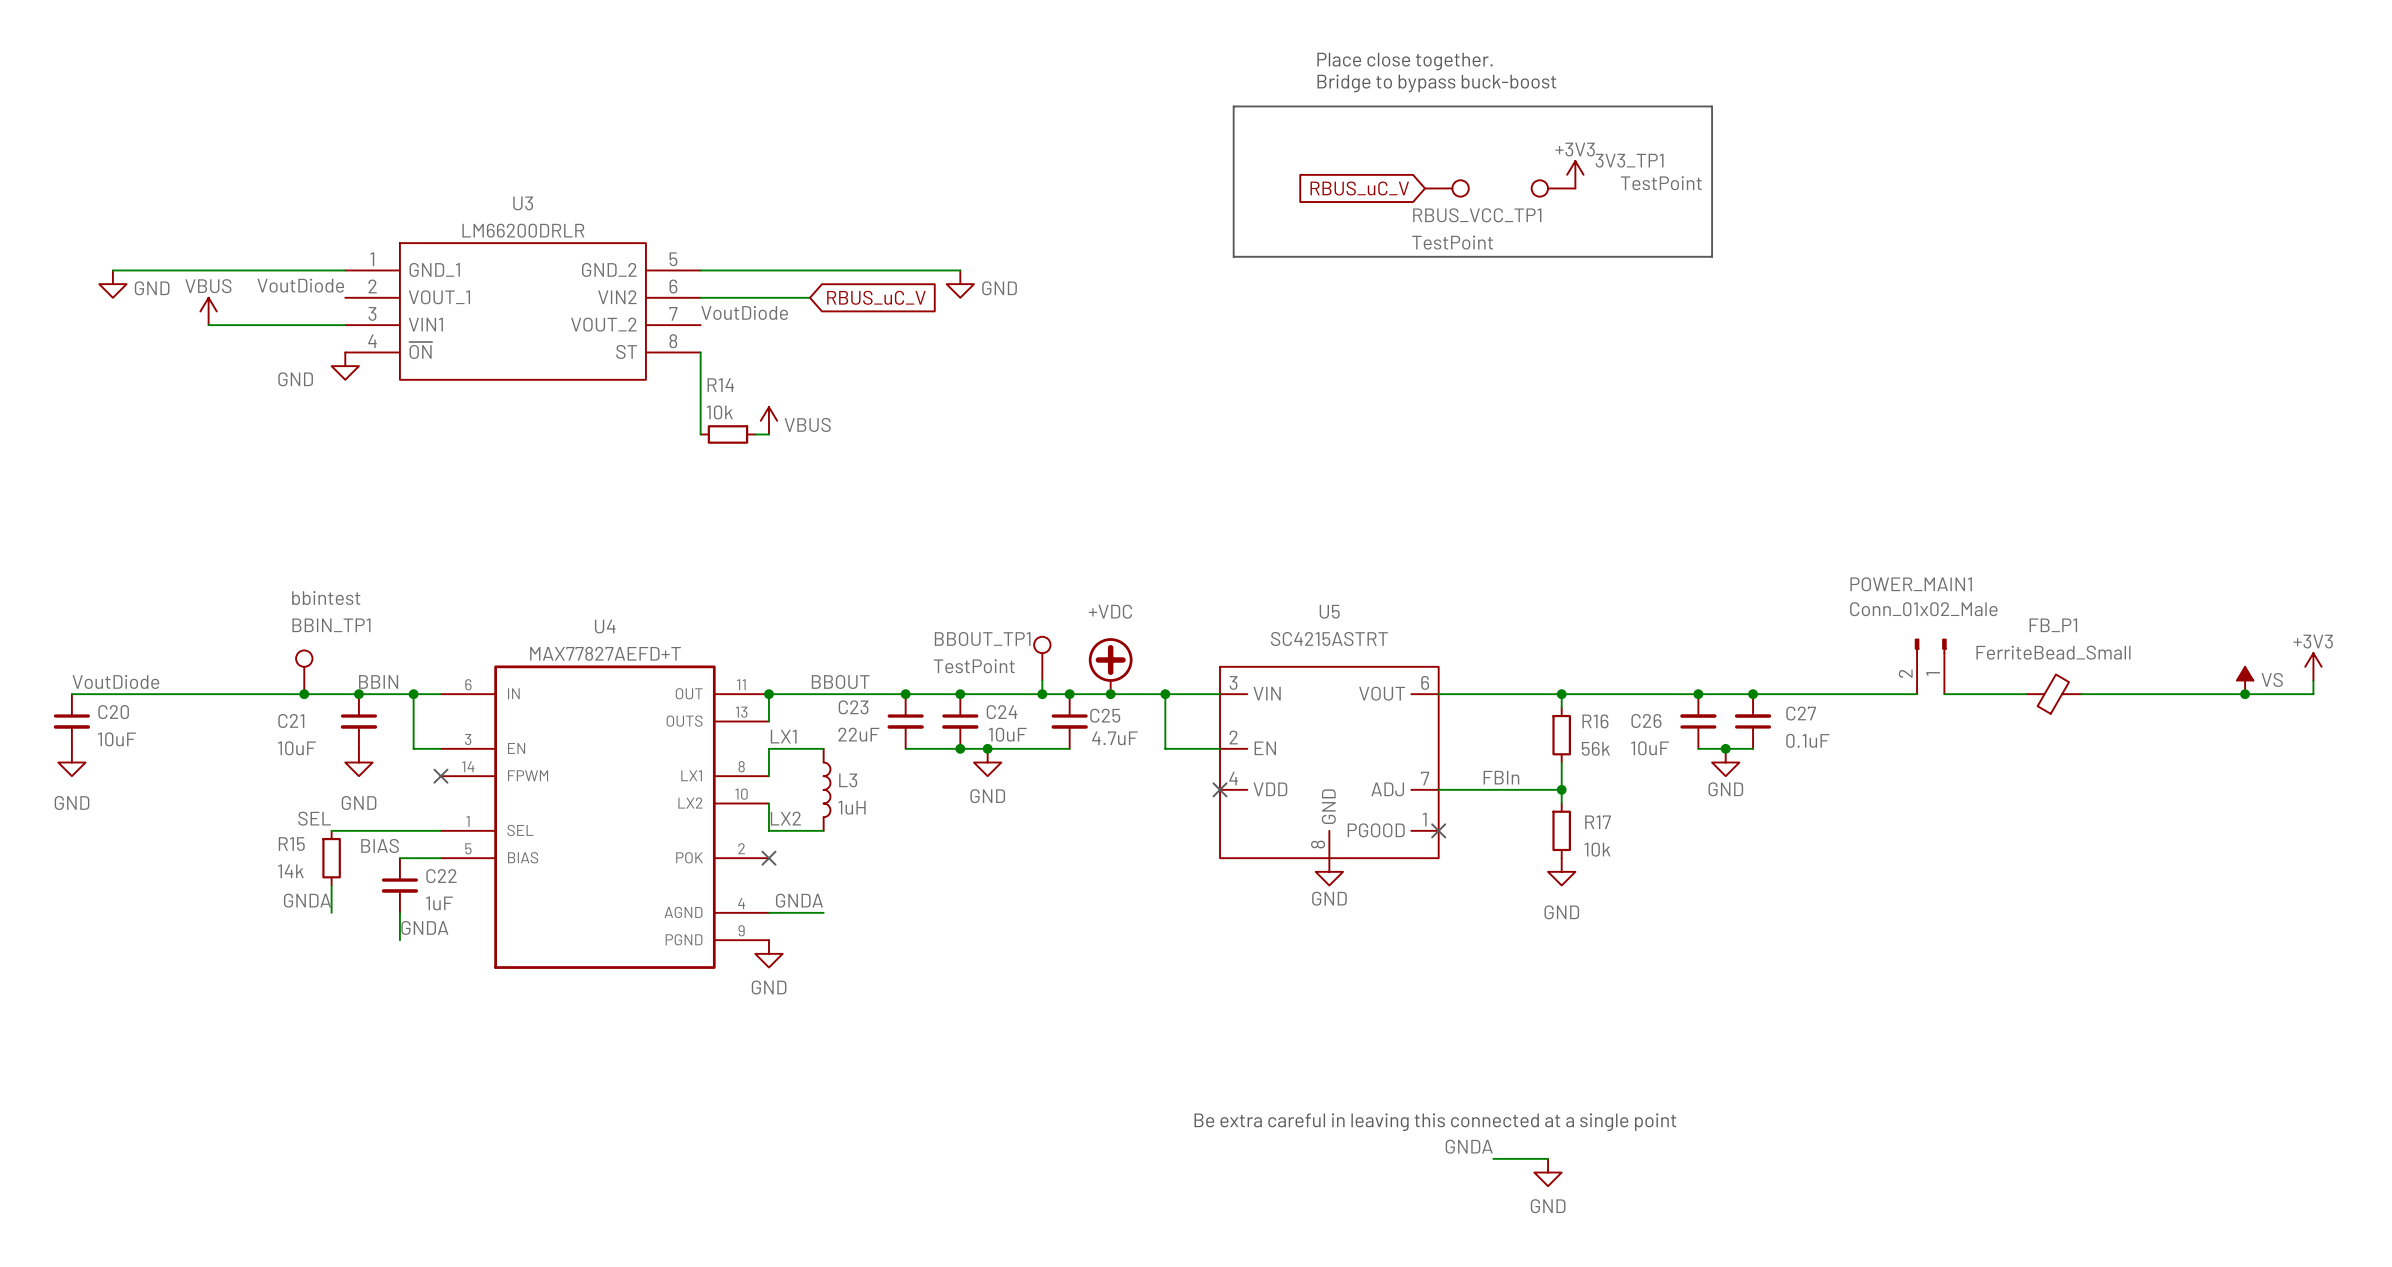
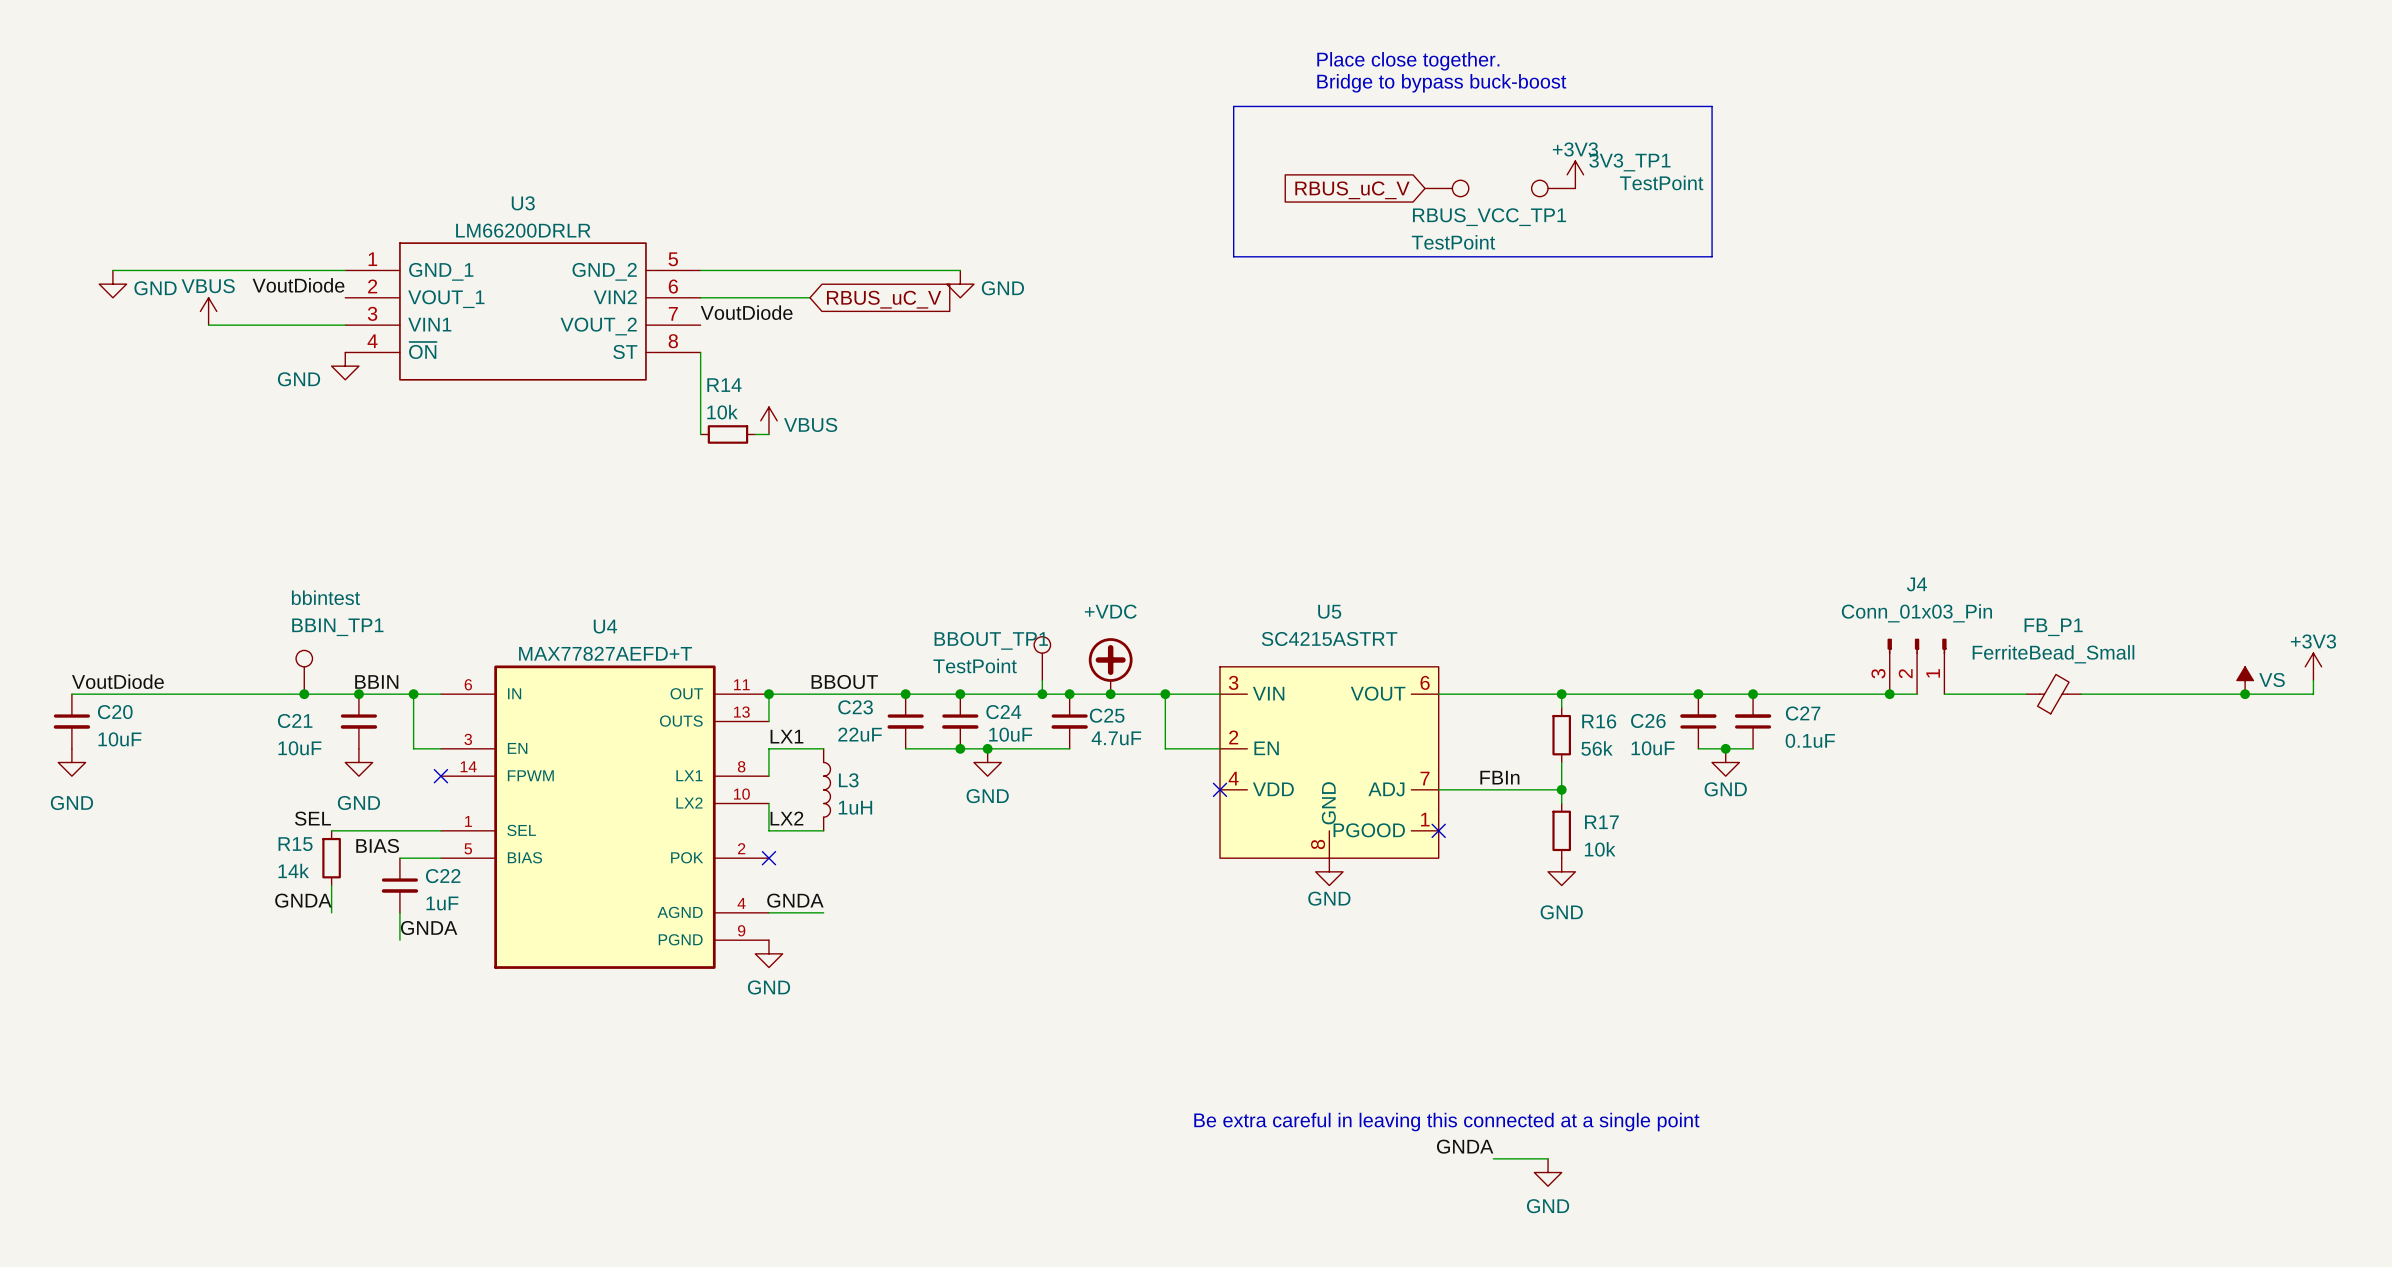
J4: none -> Conn_01x03_Pin (1917, 666)
POWER_MAIN1: Conn_01x02_Male (1930, 666) -> none
junction: none -> (1889, 694)

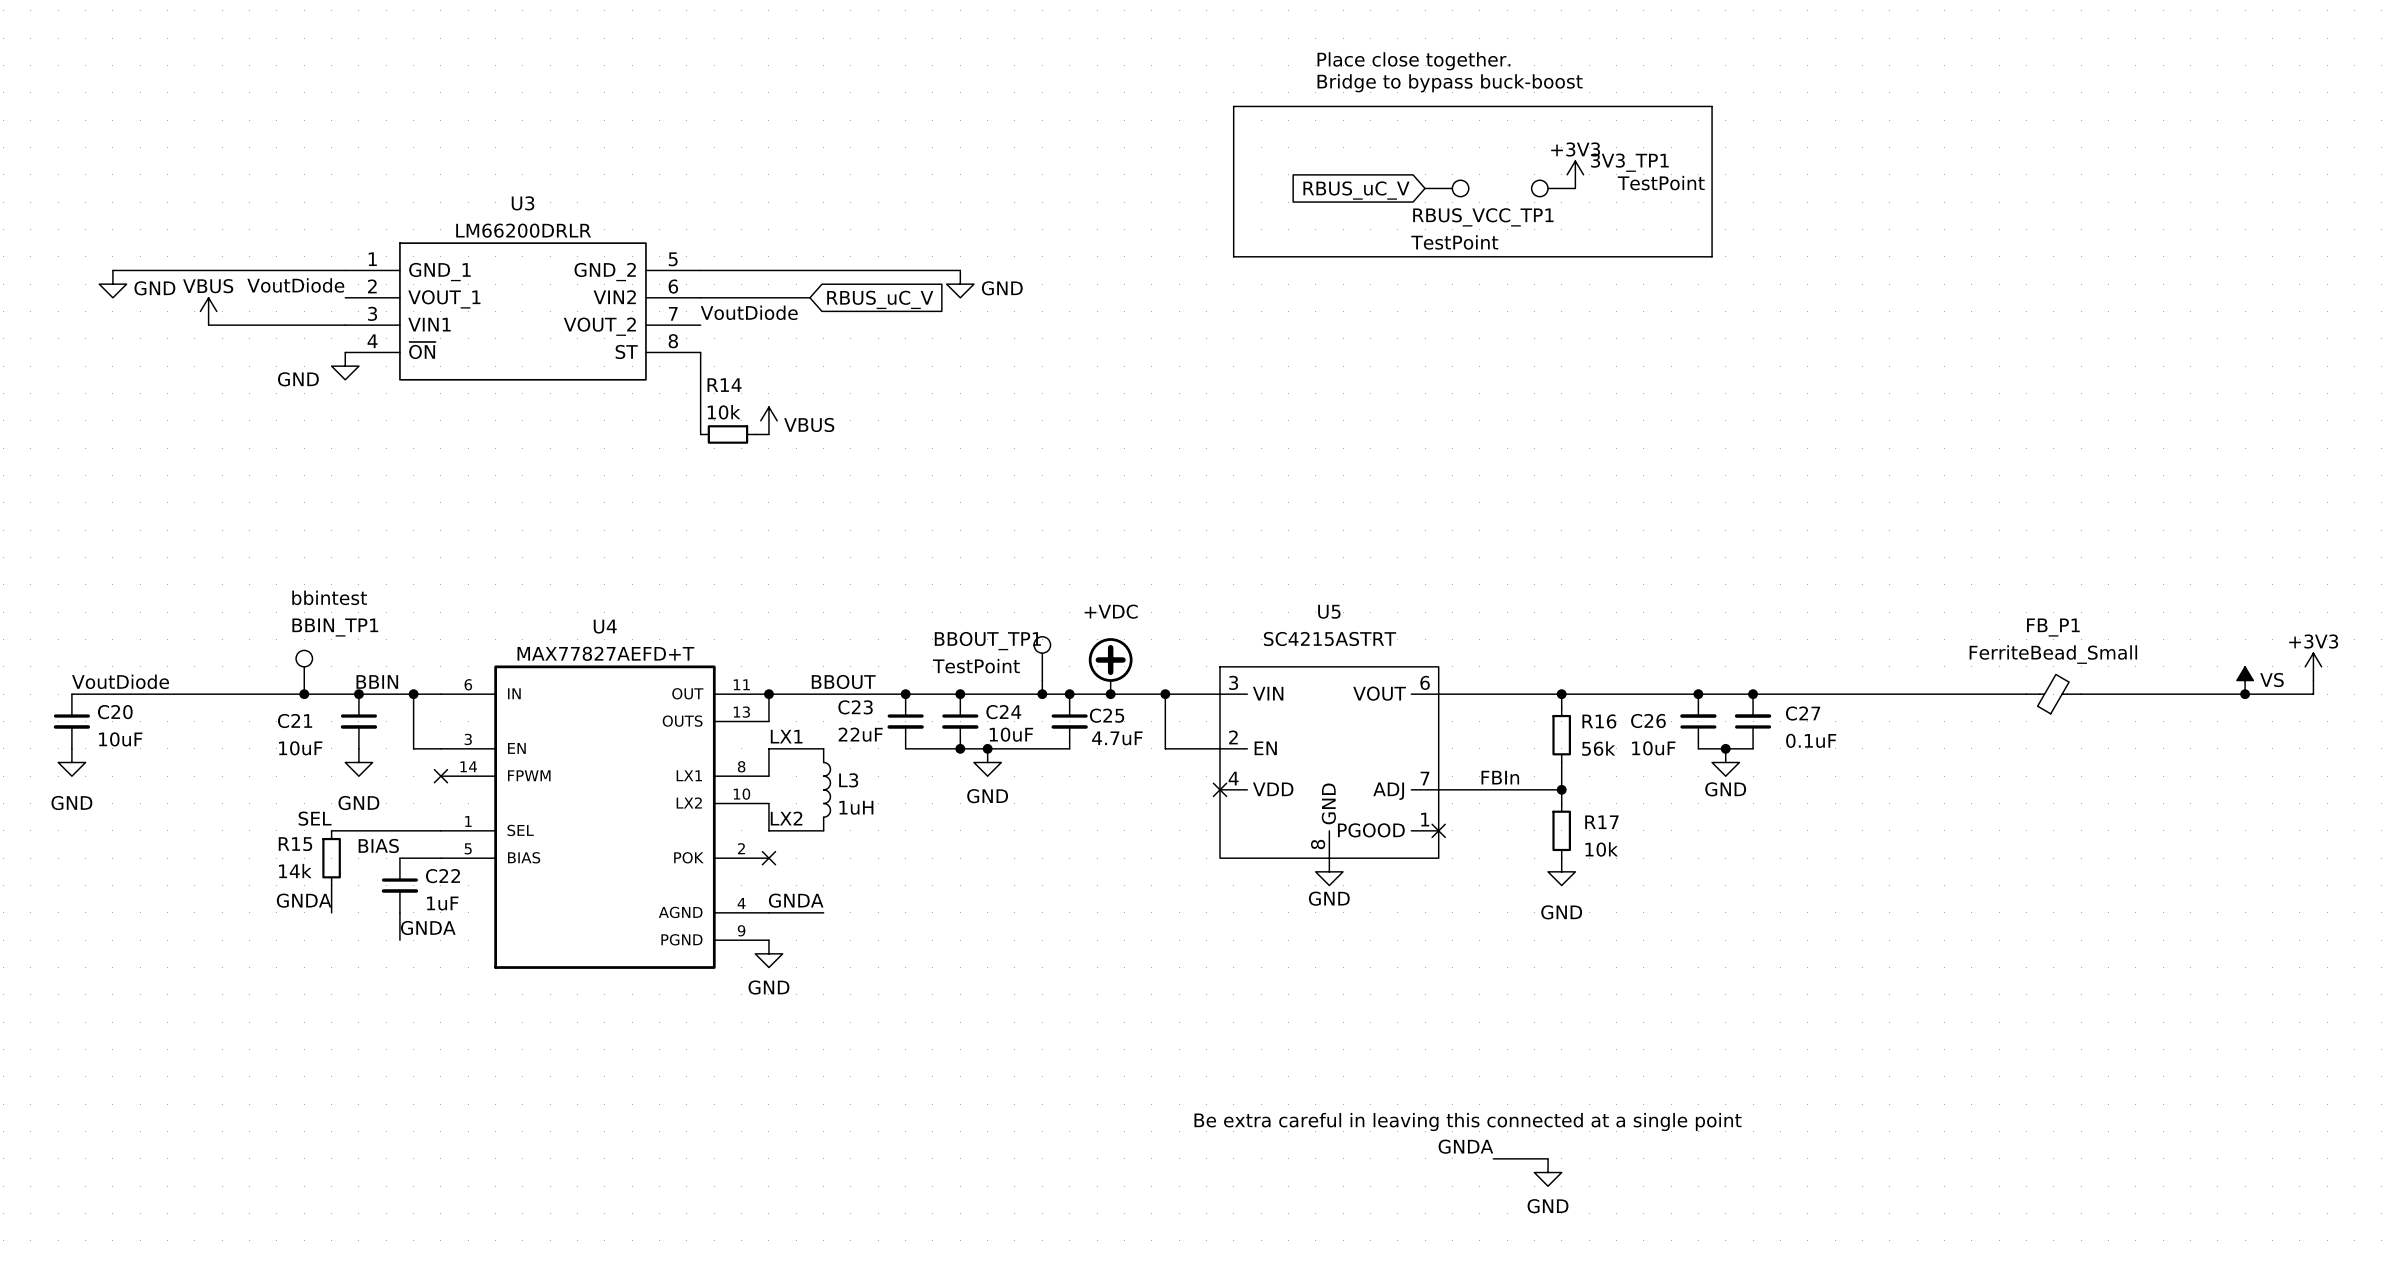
J4: Conn_01x03_Pin (1917, 666) -> none
junction: (1889, 694) -> none
wire: none -> (1917, 694) (1944, 694)

